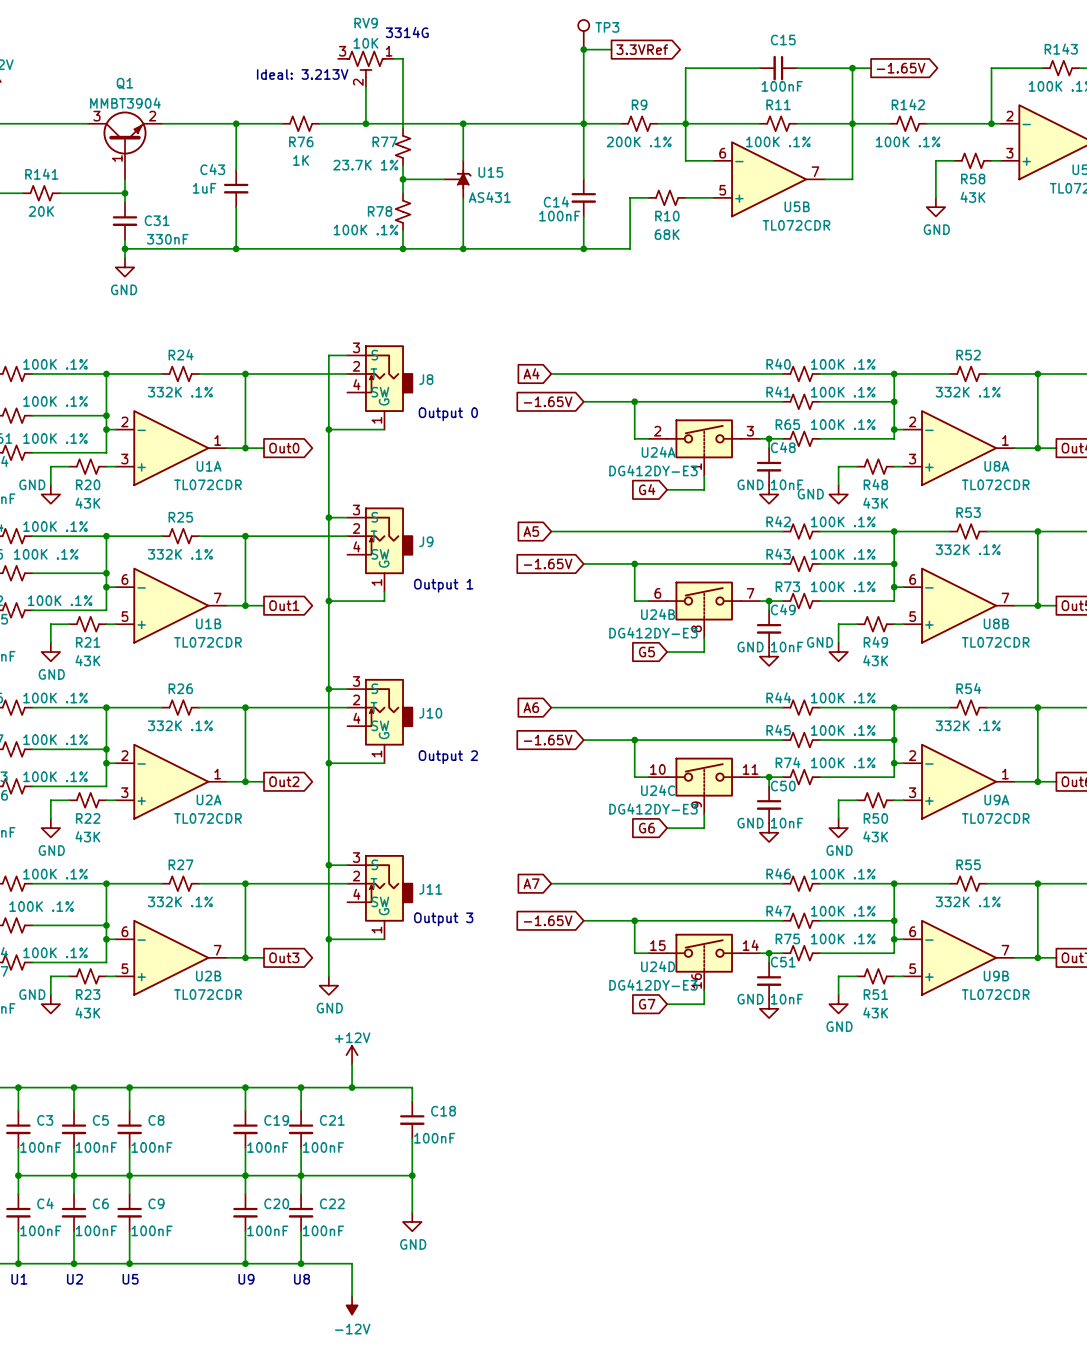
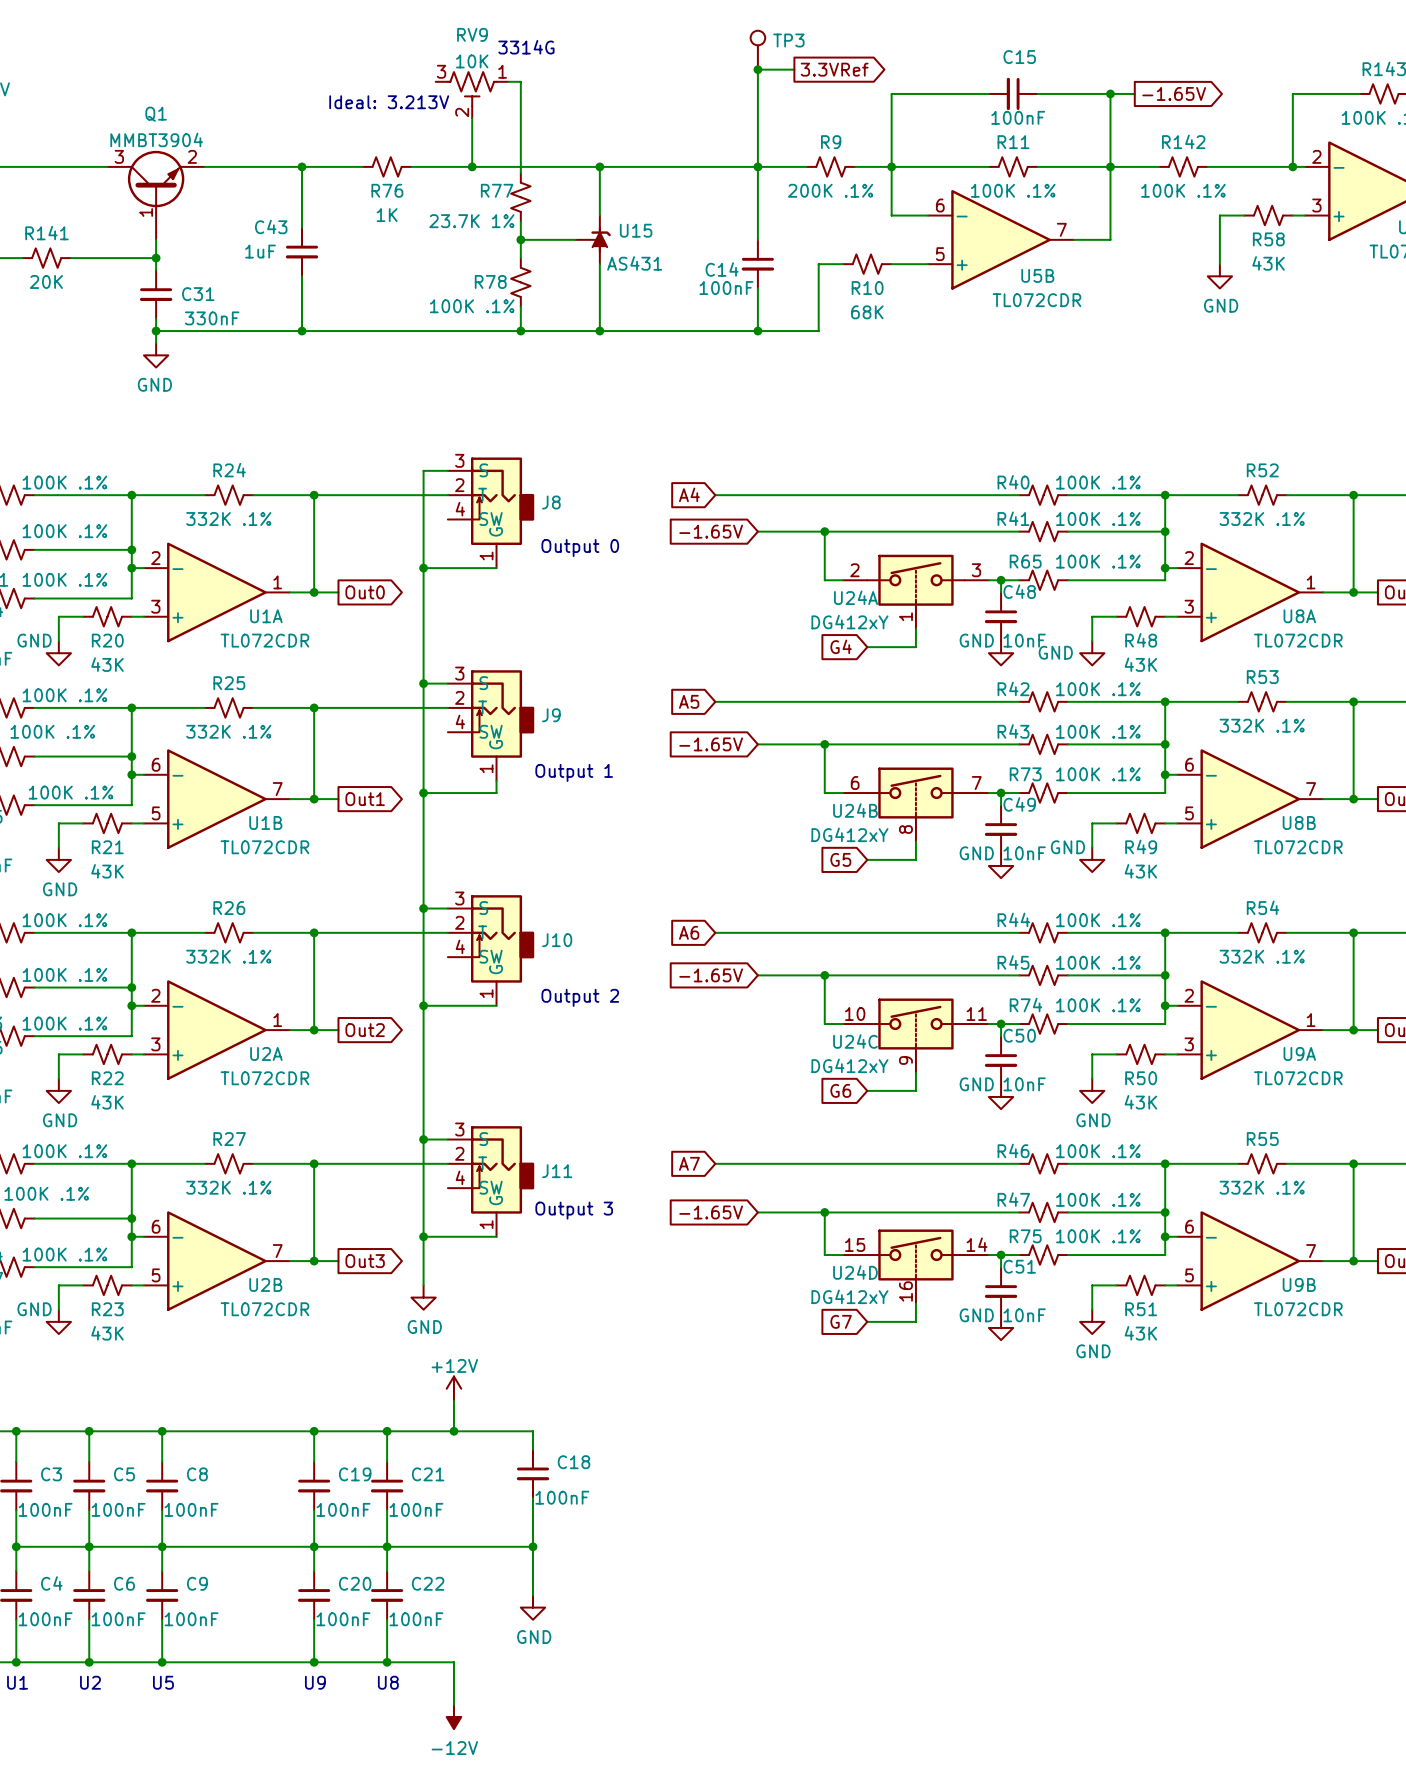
U24A value: DG412DY-E3 (653, 470) -> DG412xY (849, 622)
U24B value: DG412DY-E3 (653, 632) -> DG412xY (849, 834)
U24C value: DG412DY-E3 (653, 809) -> DG412xY (849, 1065)
U24D value: DG412DY-E3 (653, 985) -> DG412xY (849, 1296)

